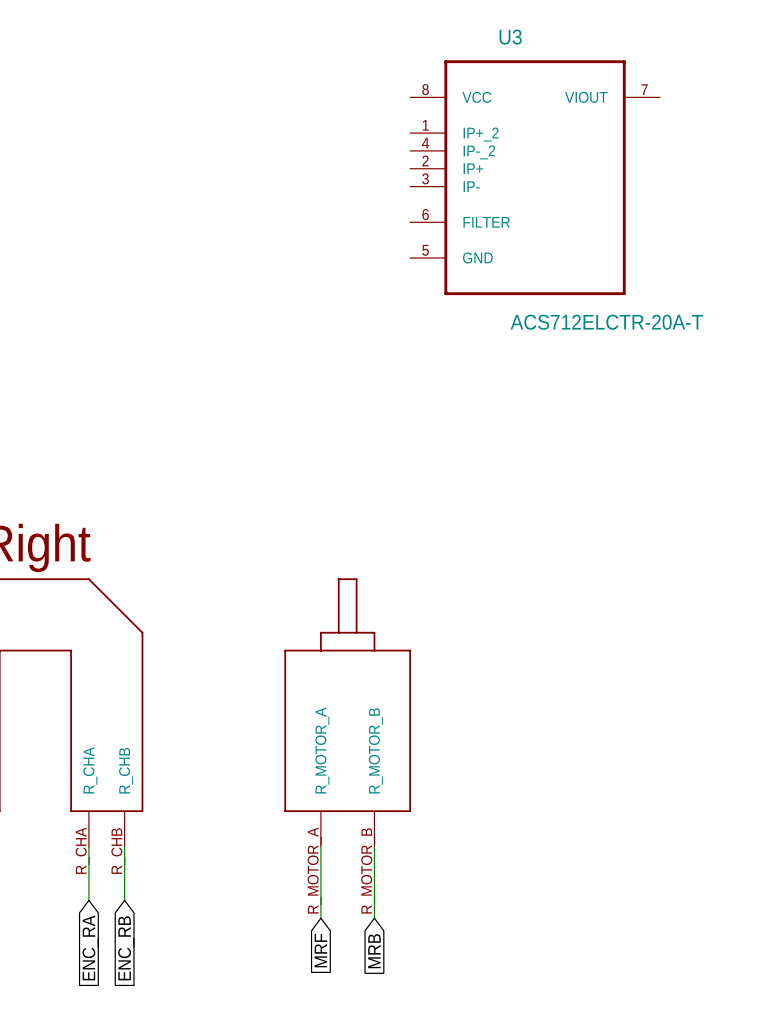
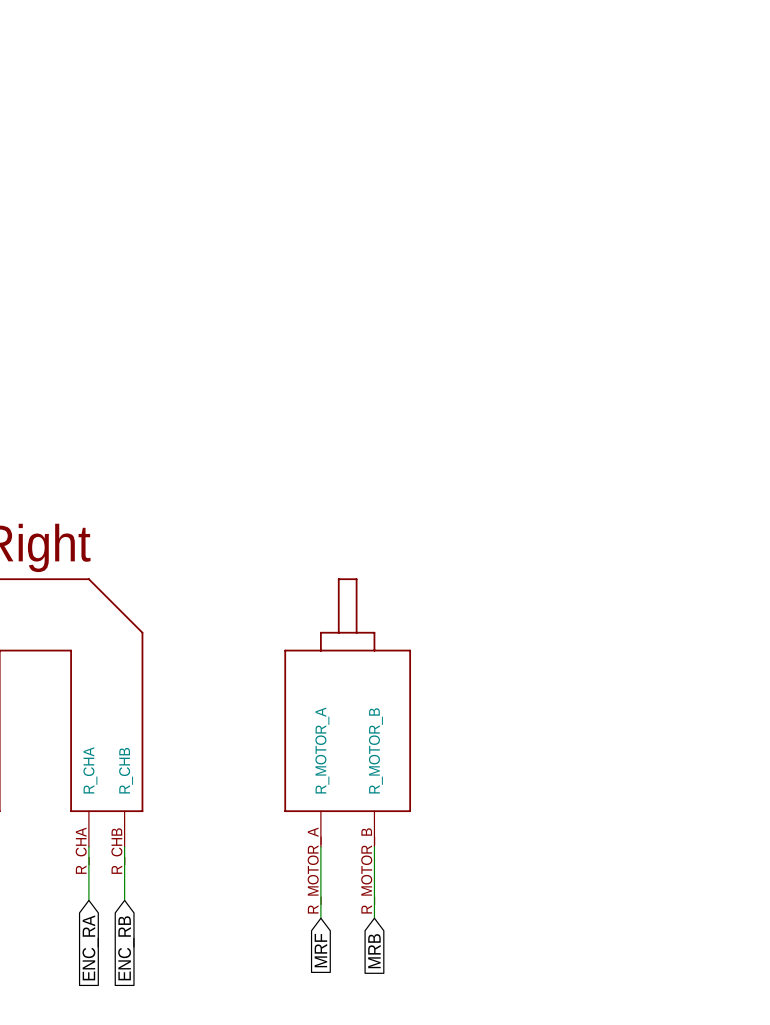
U3: ACS712ELCTR-20A-T (535, 177) -> none

